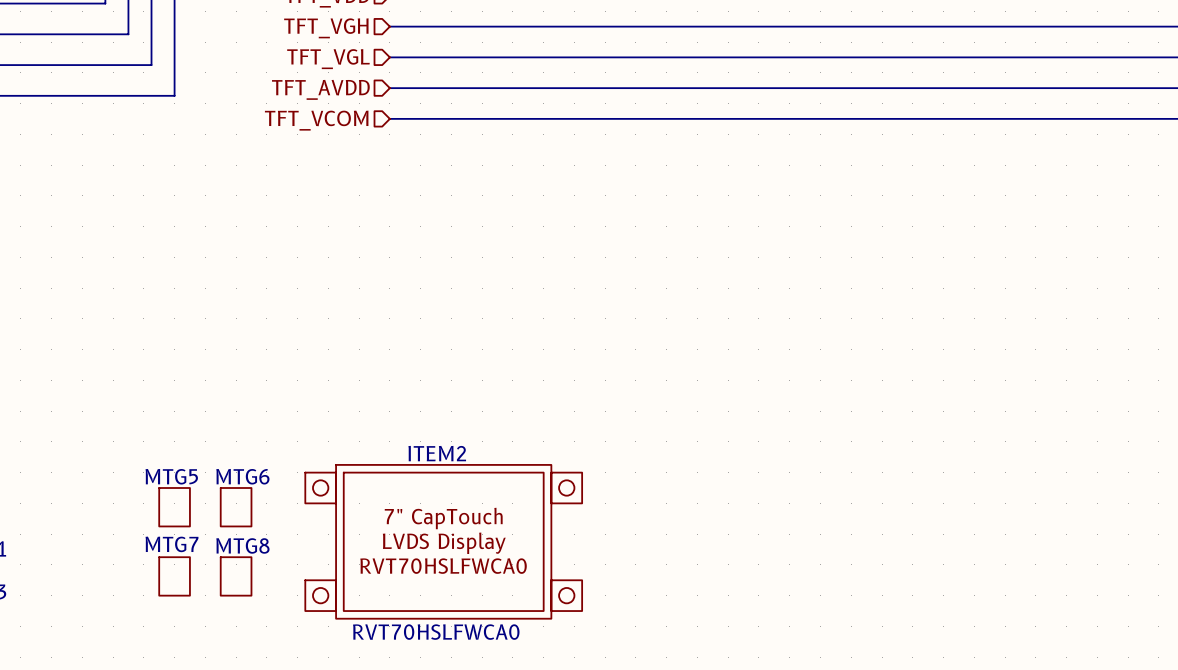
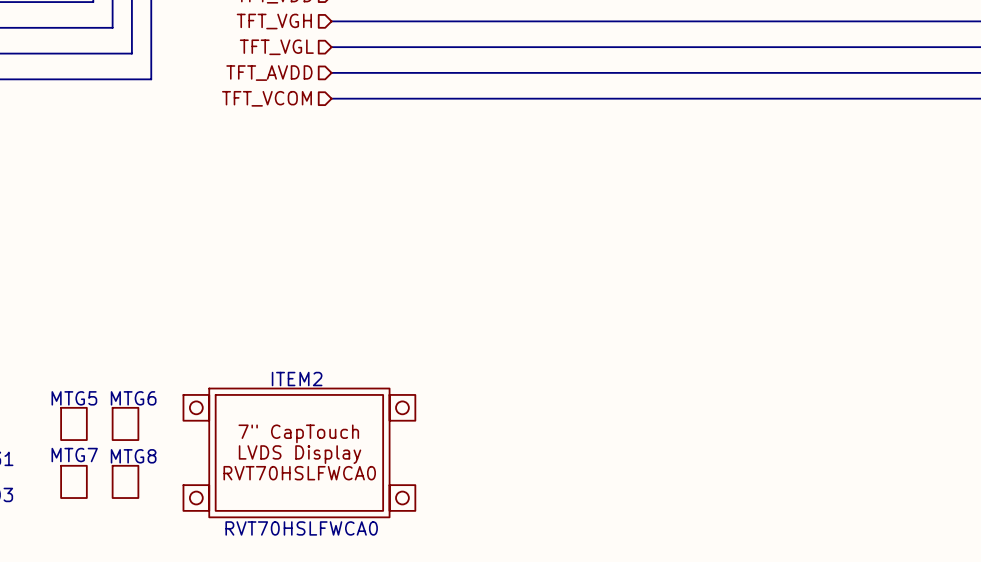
MTG5 position: (174, 507) -> (73, 423)
MTG6 position: (236, 507) -> (125, 423)
ITEM2 position: (443, 541) -> (299, 452)
MTG7 position: (174, 576) -> (73, 481)
MTG8 position: (236, 576) -> (125, 481)

